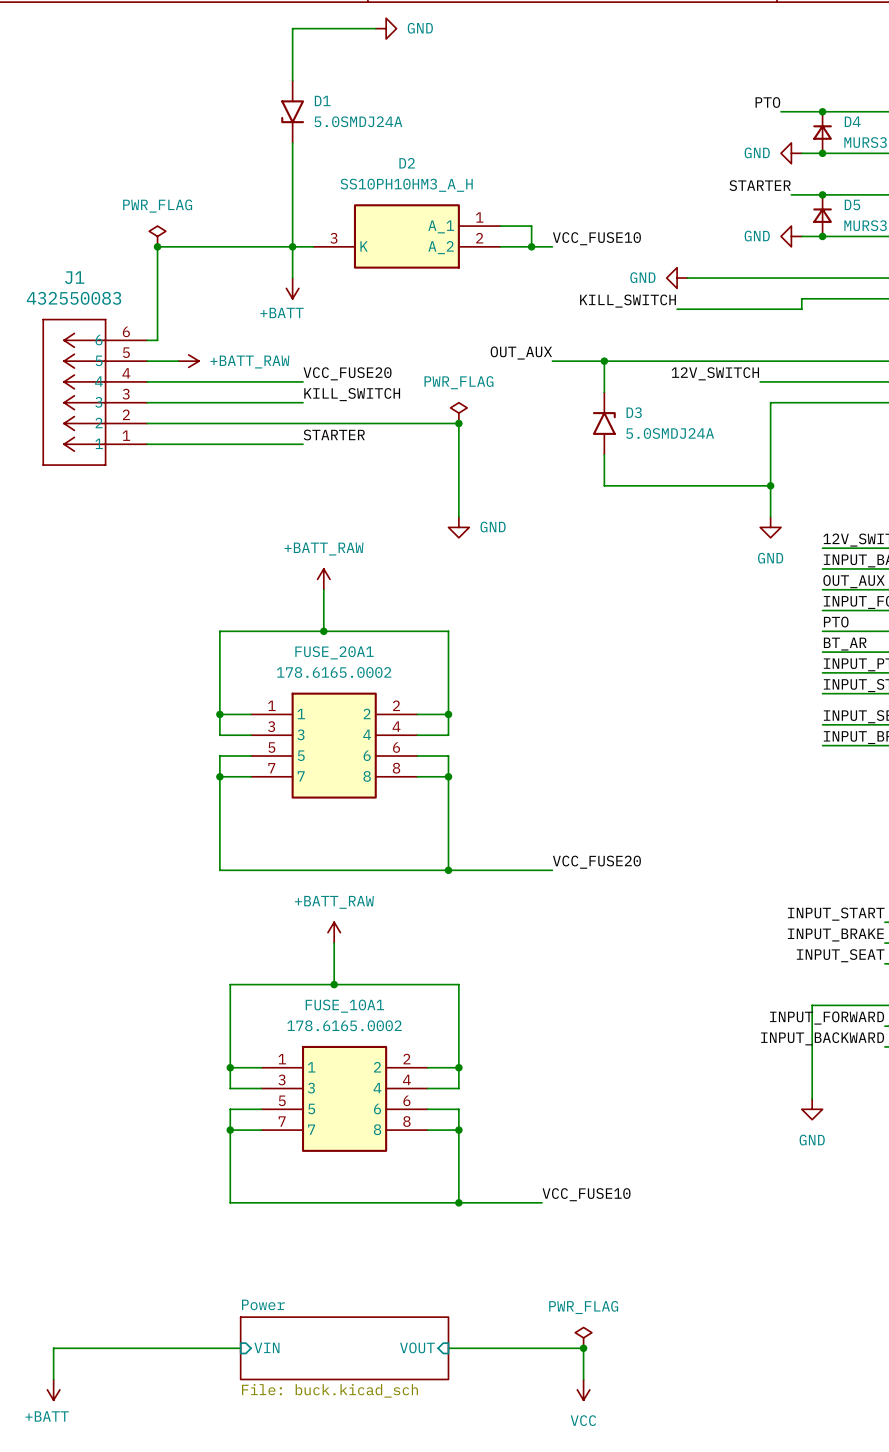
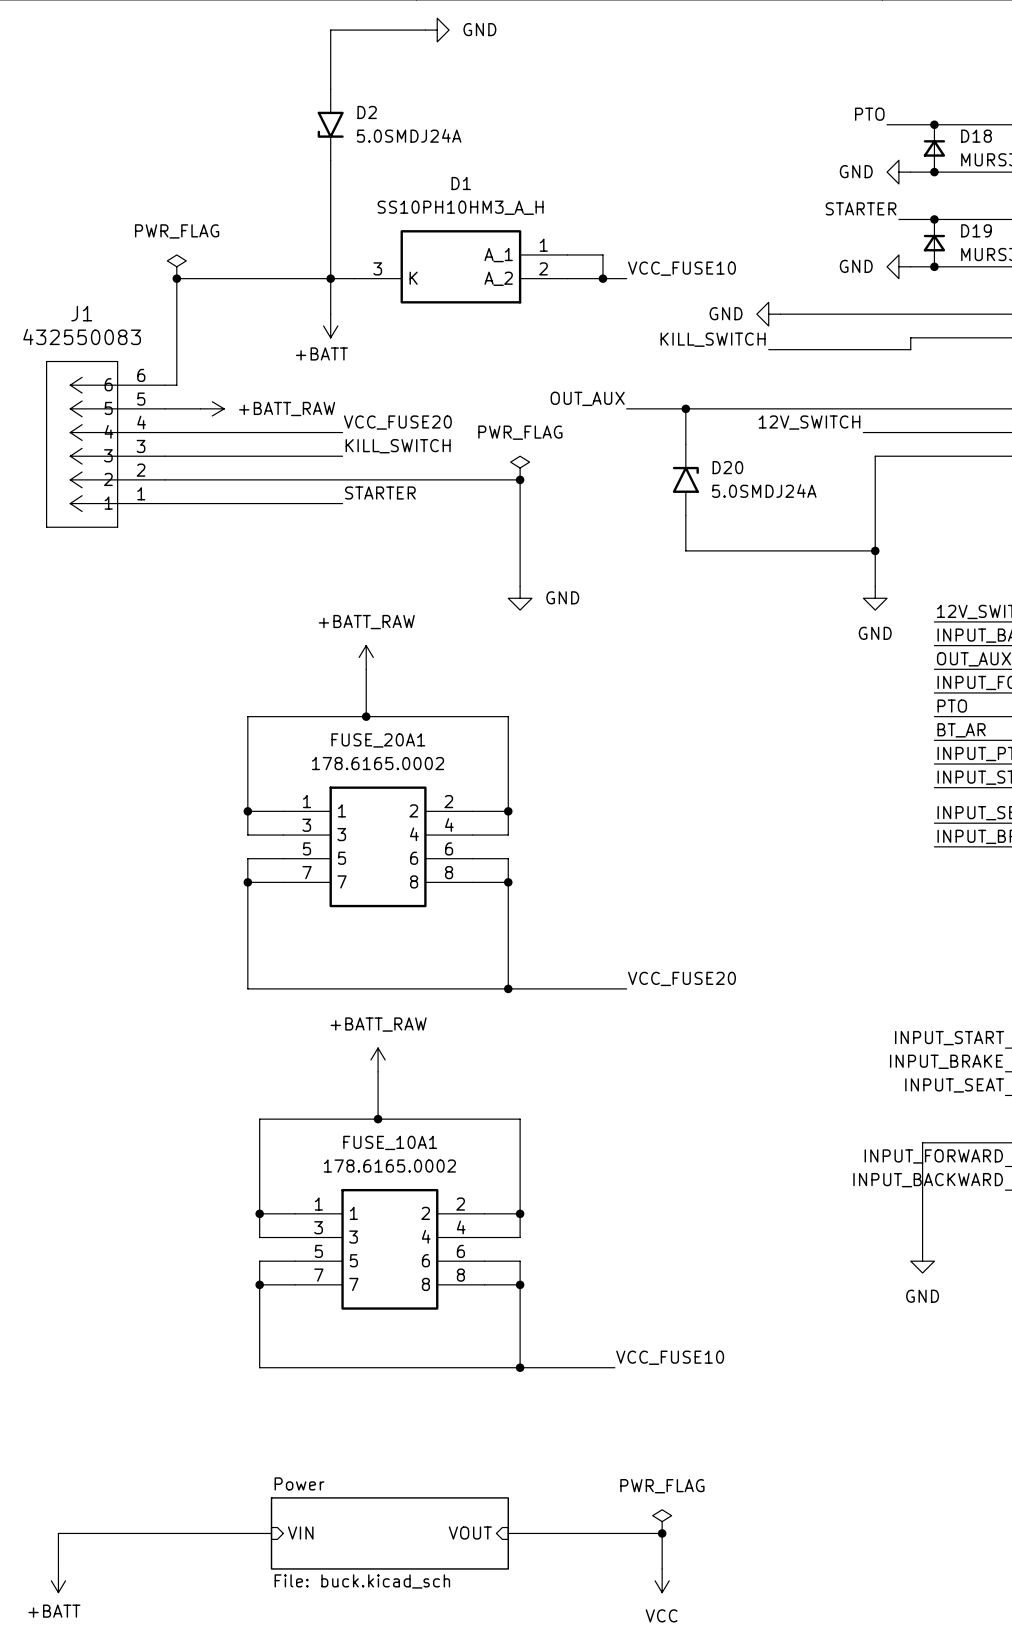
D1 name: D1 (322, 100) -> D2 (367, 112)
D4 name: D4 (852, 121) -> D18 (976, 136)
D2 name: D2 (407, 163) -> D1 (461, 183)
D5 name: D5 (852, 204) -> D19 (976, 230)
D3 name: D3 (634, 412) -> D20 (727, 467)

